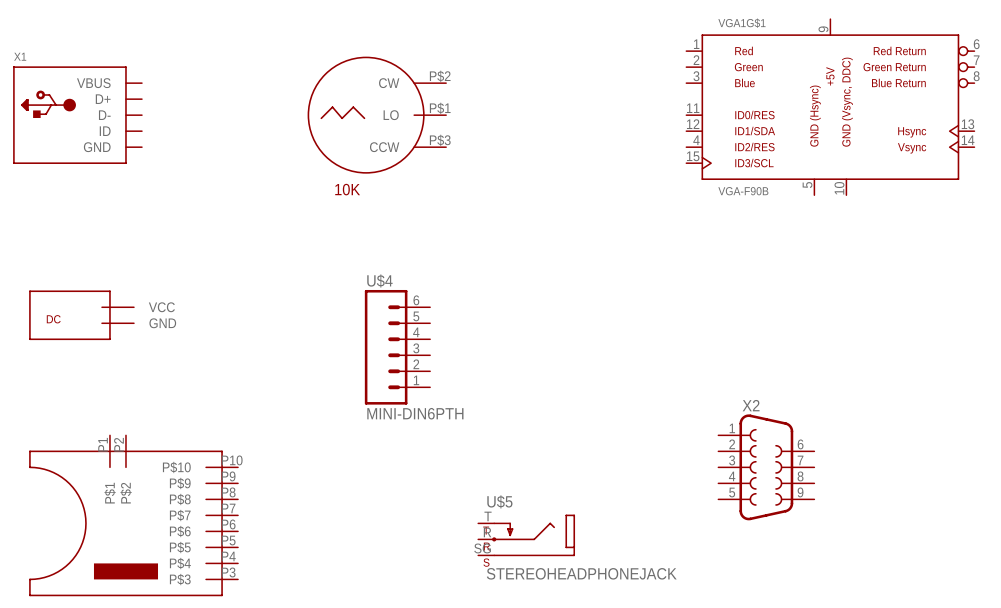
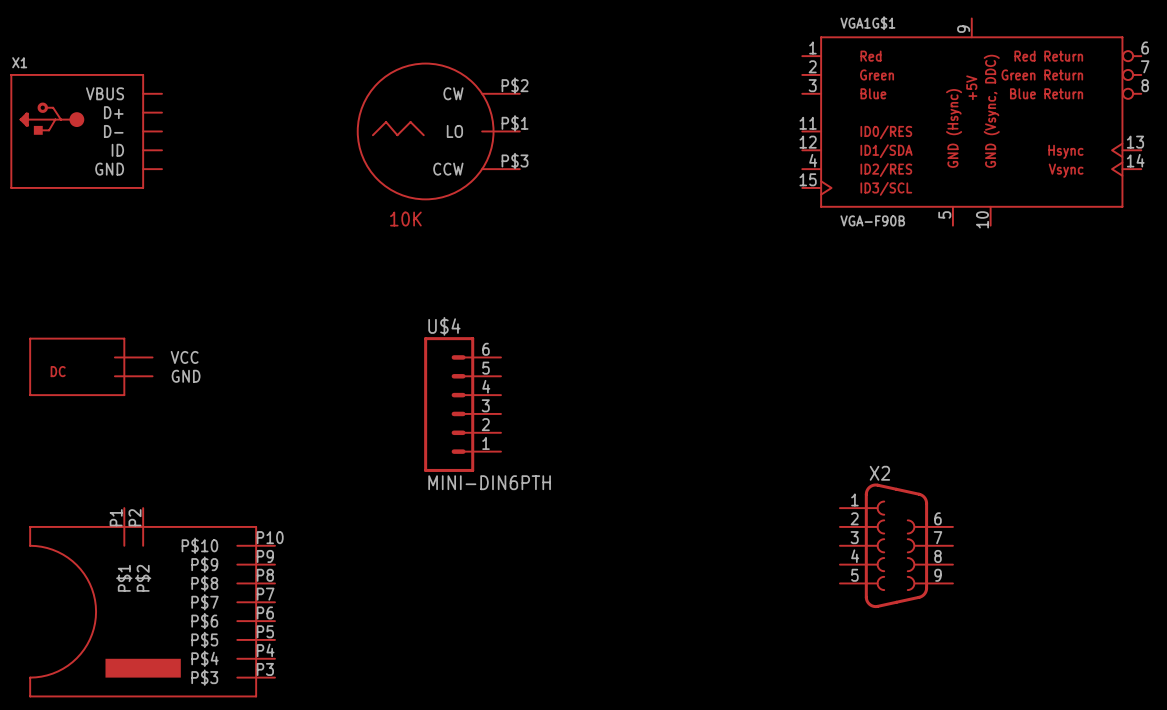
U$5: STEREOHEADPHONEJACK (526, 535) -> none

